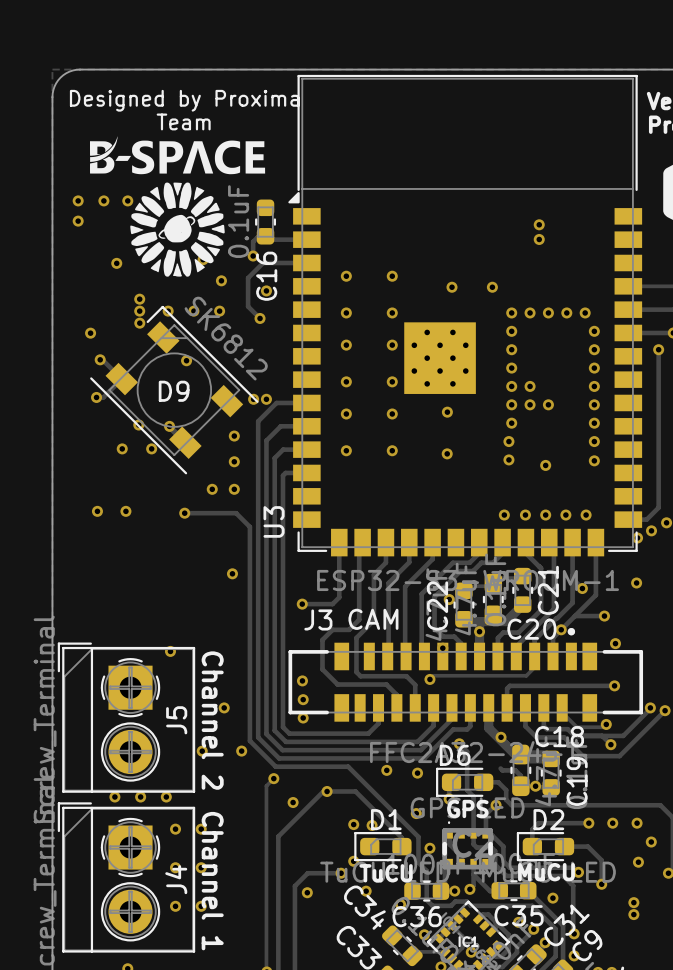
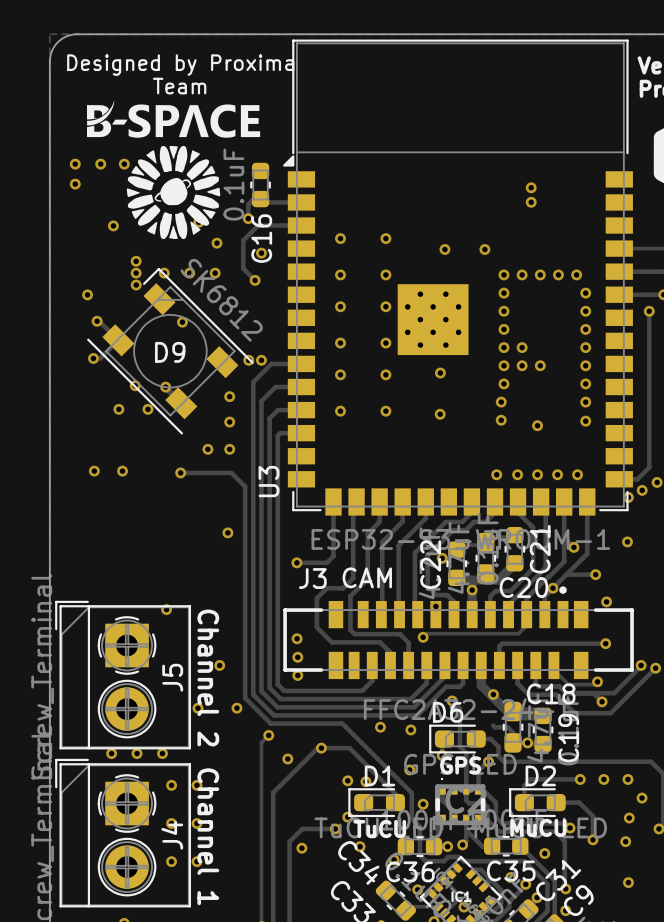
via: none -> (625, 841)
via: (633, 902) -> none
via: (633, 914) -> none
via: none -> (628, 882)

